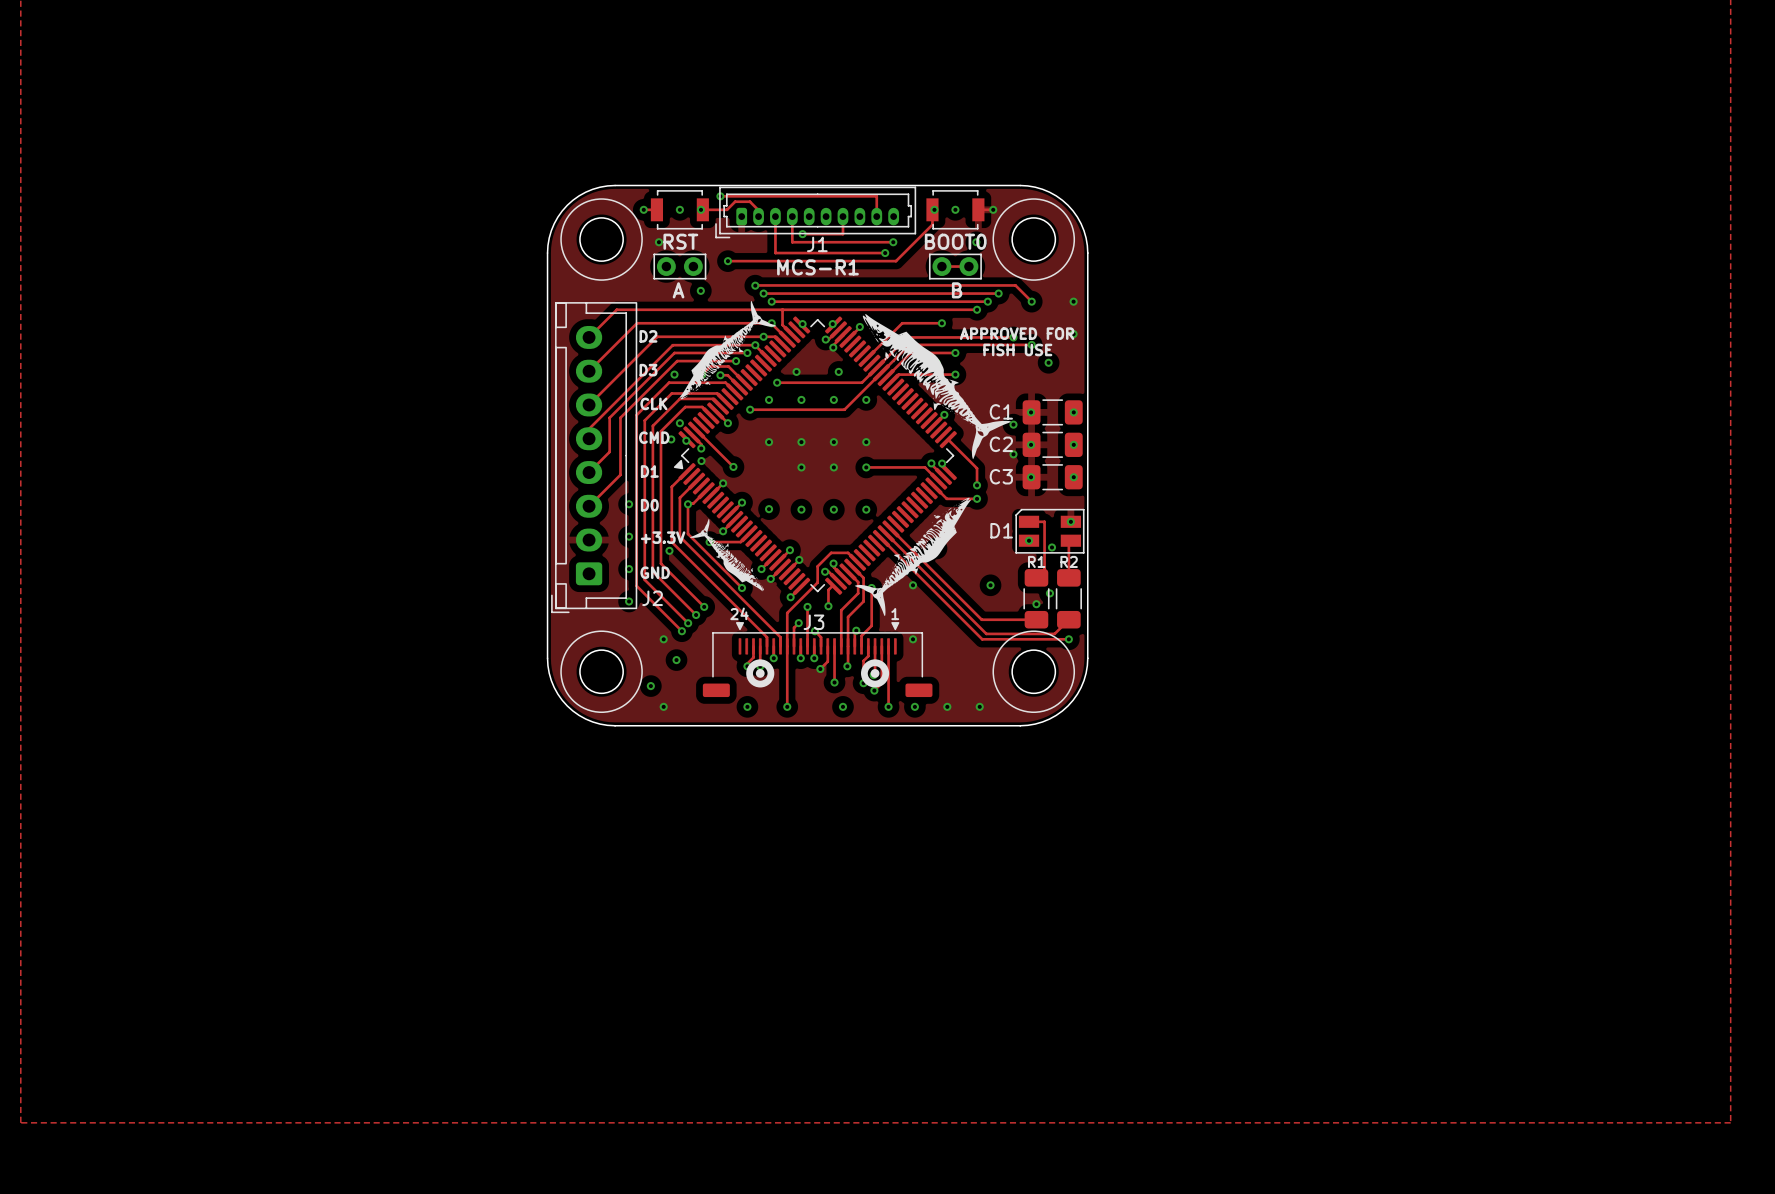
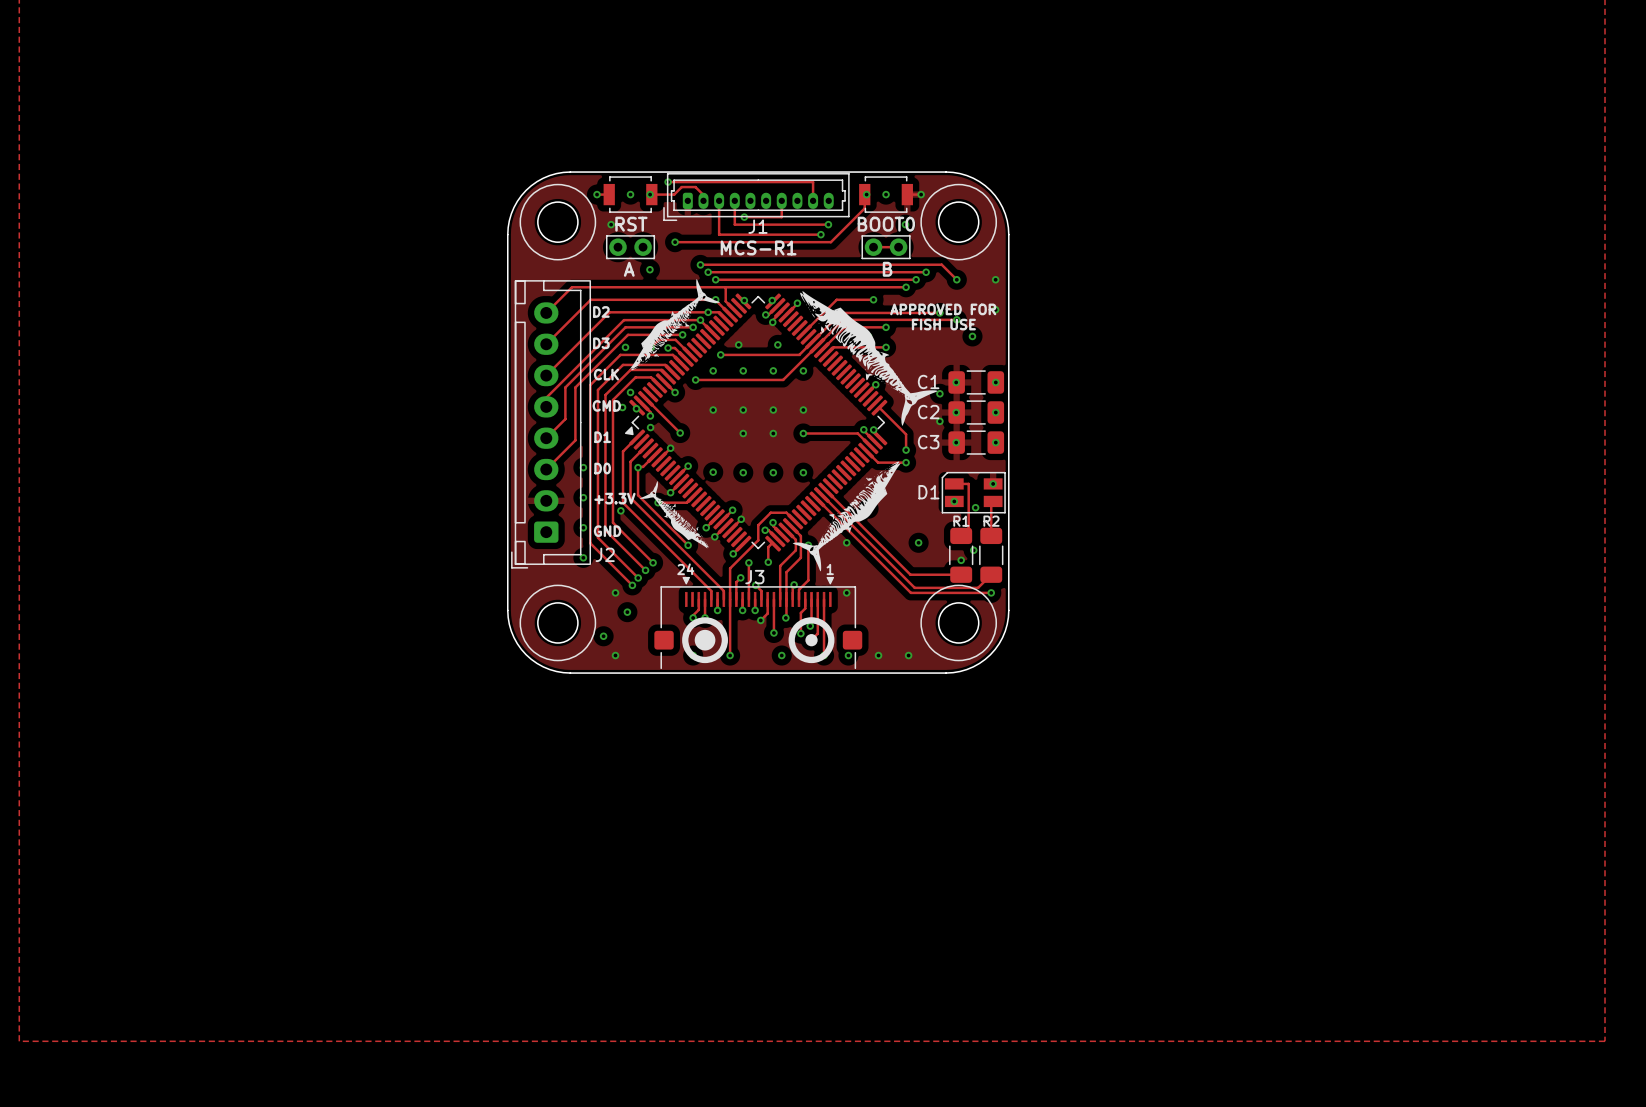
J3 footprint: [702, 622, 933, 698] -> [654, 576, 863, 669]

